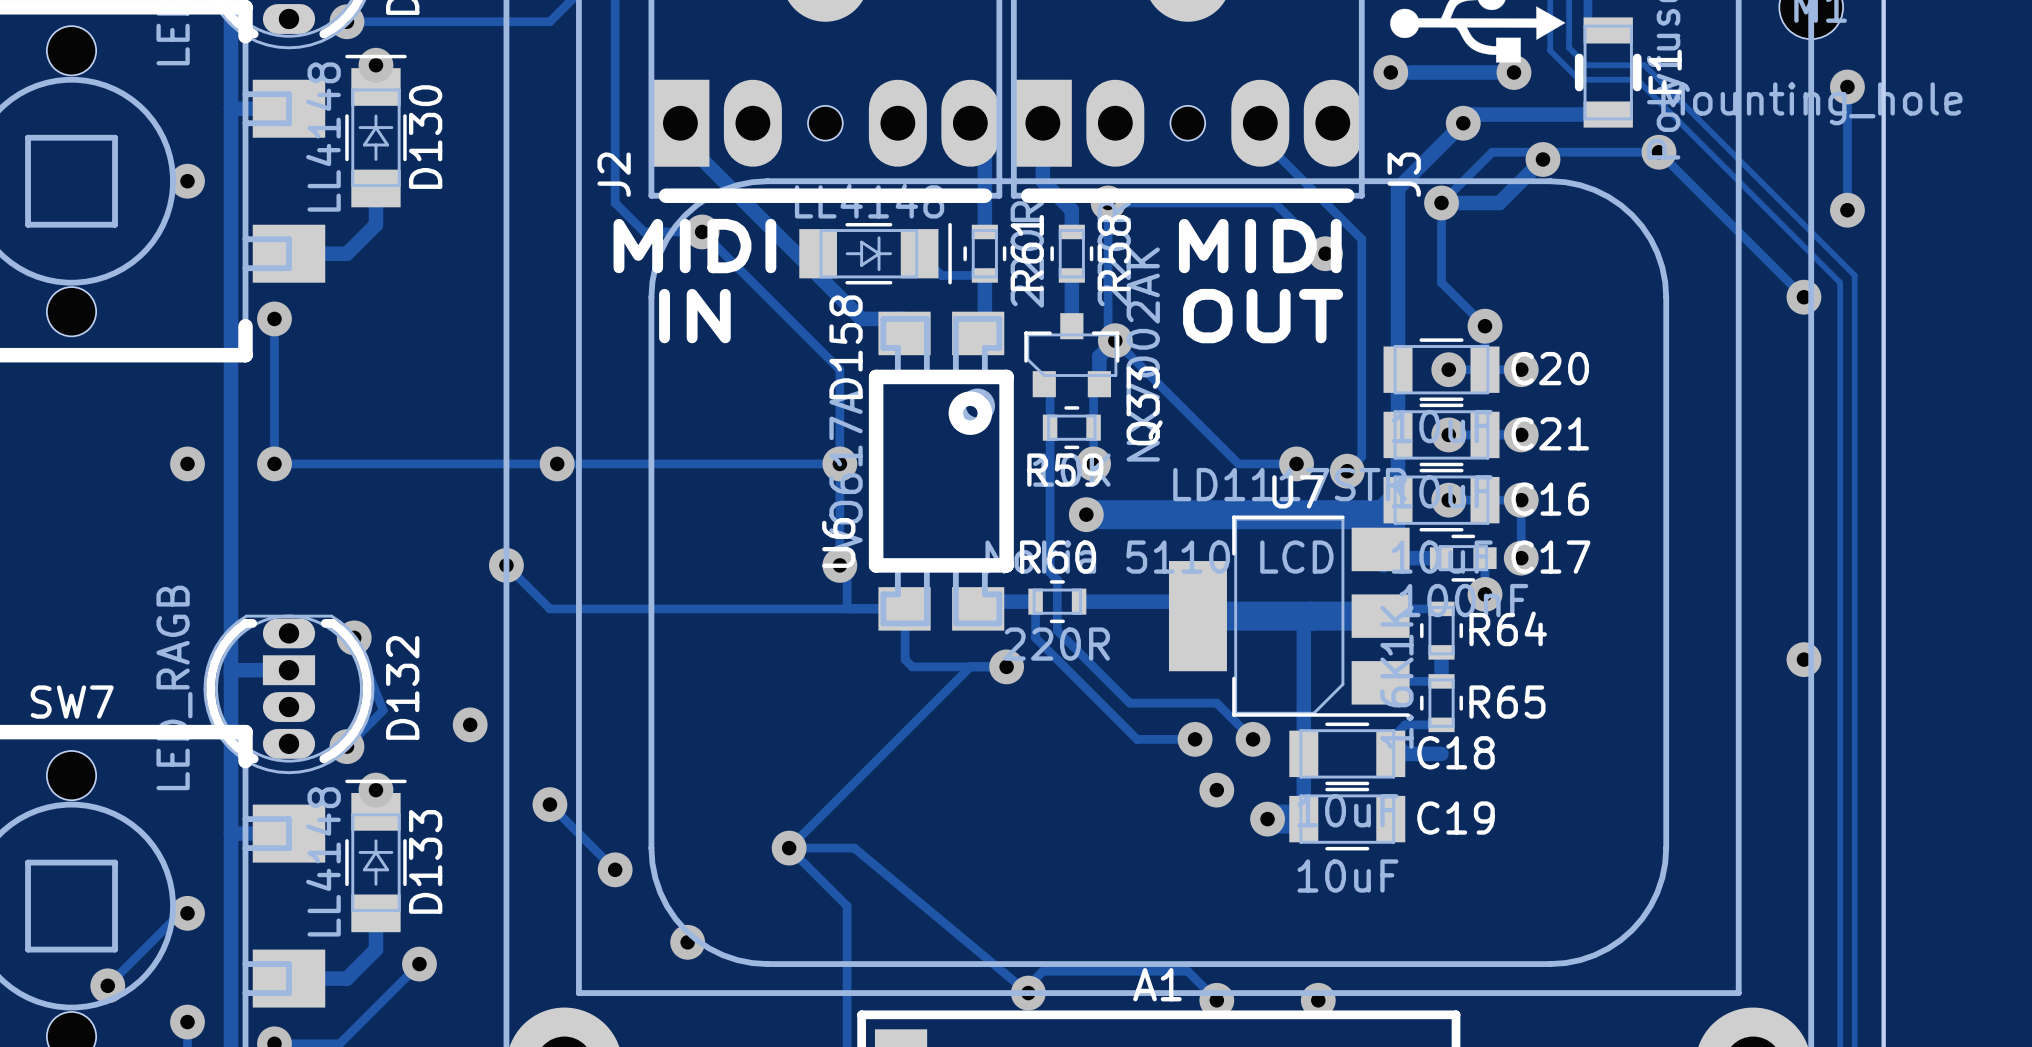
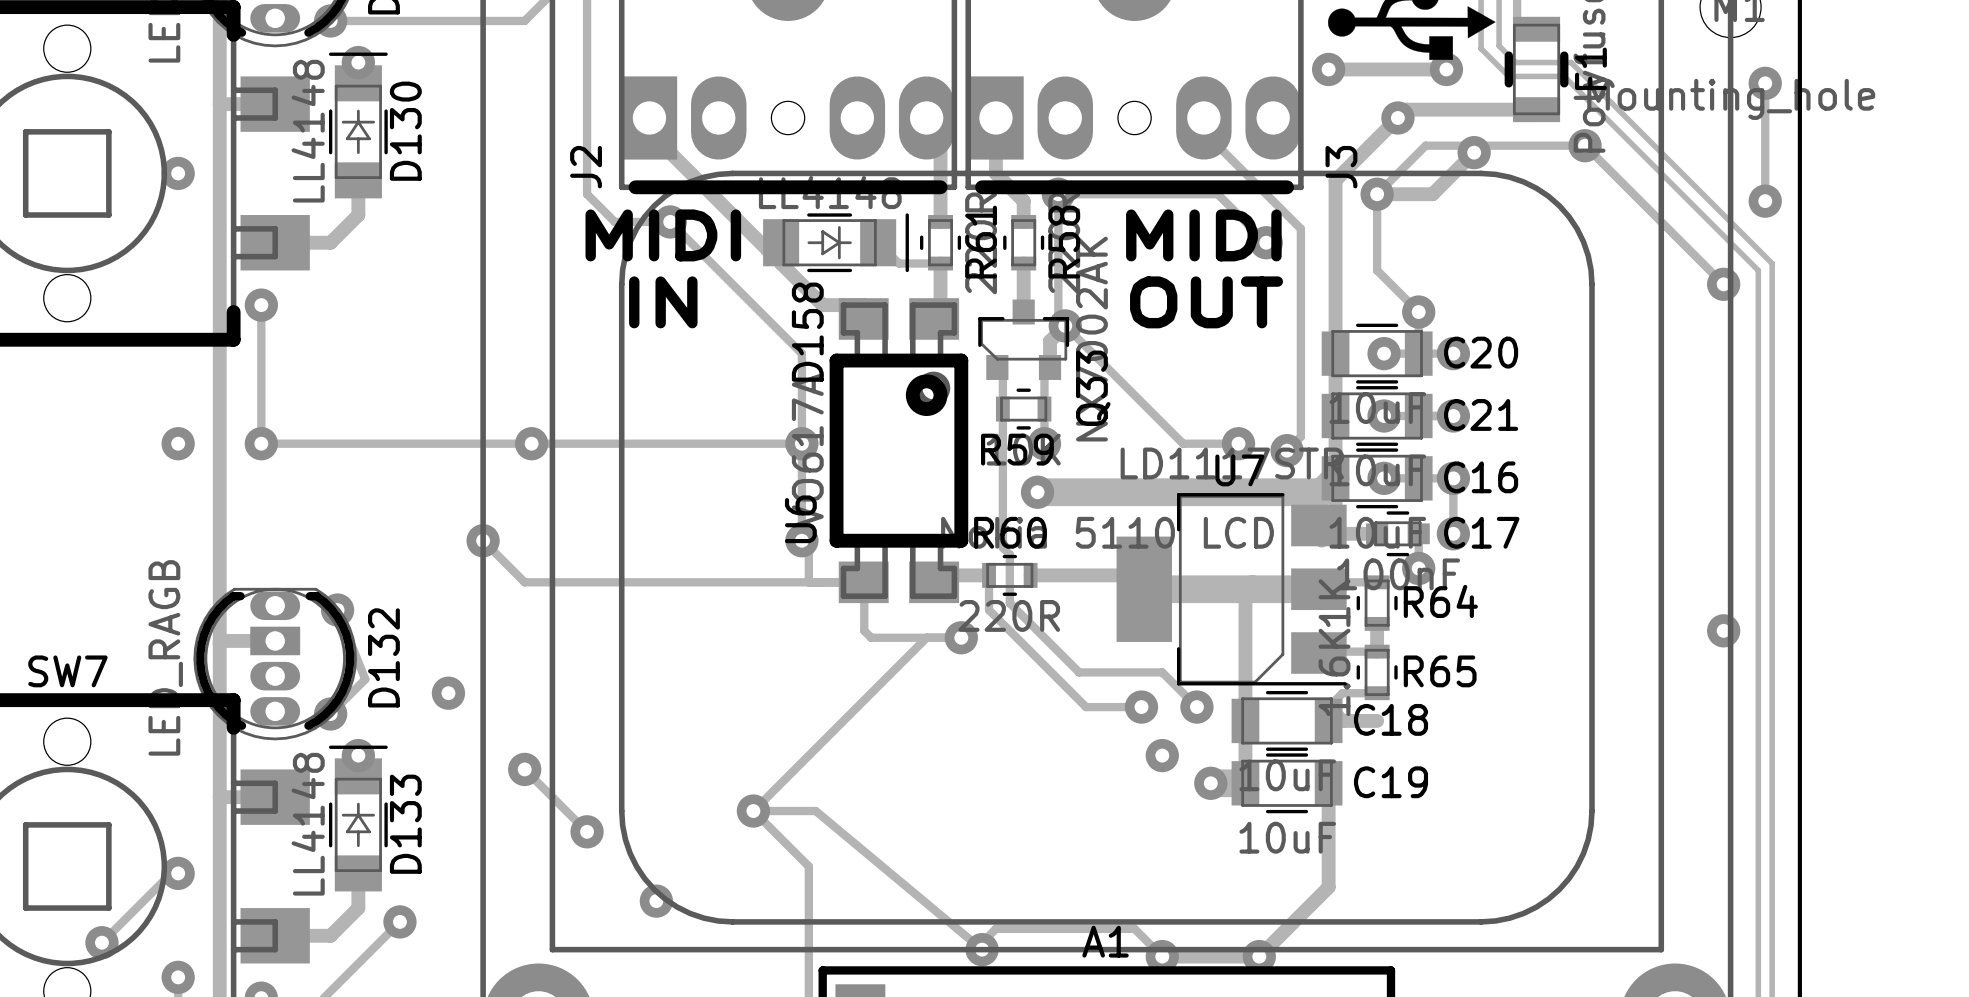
track: none -> (1328, 783) (1328, 887) (1259, 956) (1162, 956)

